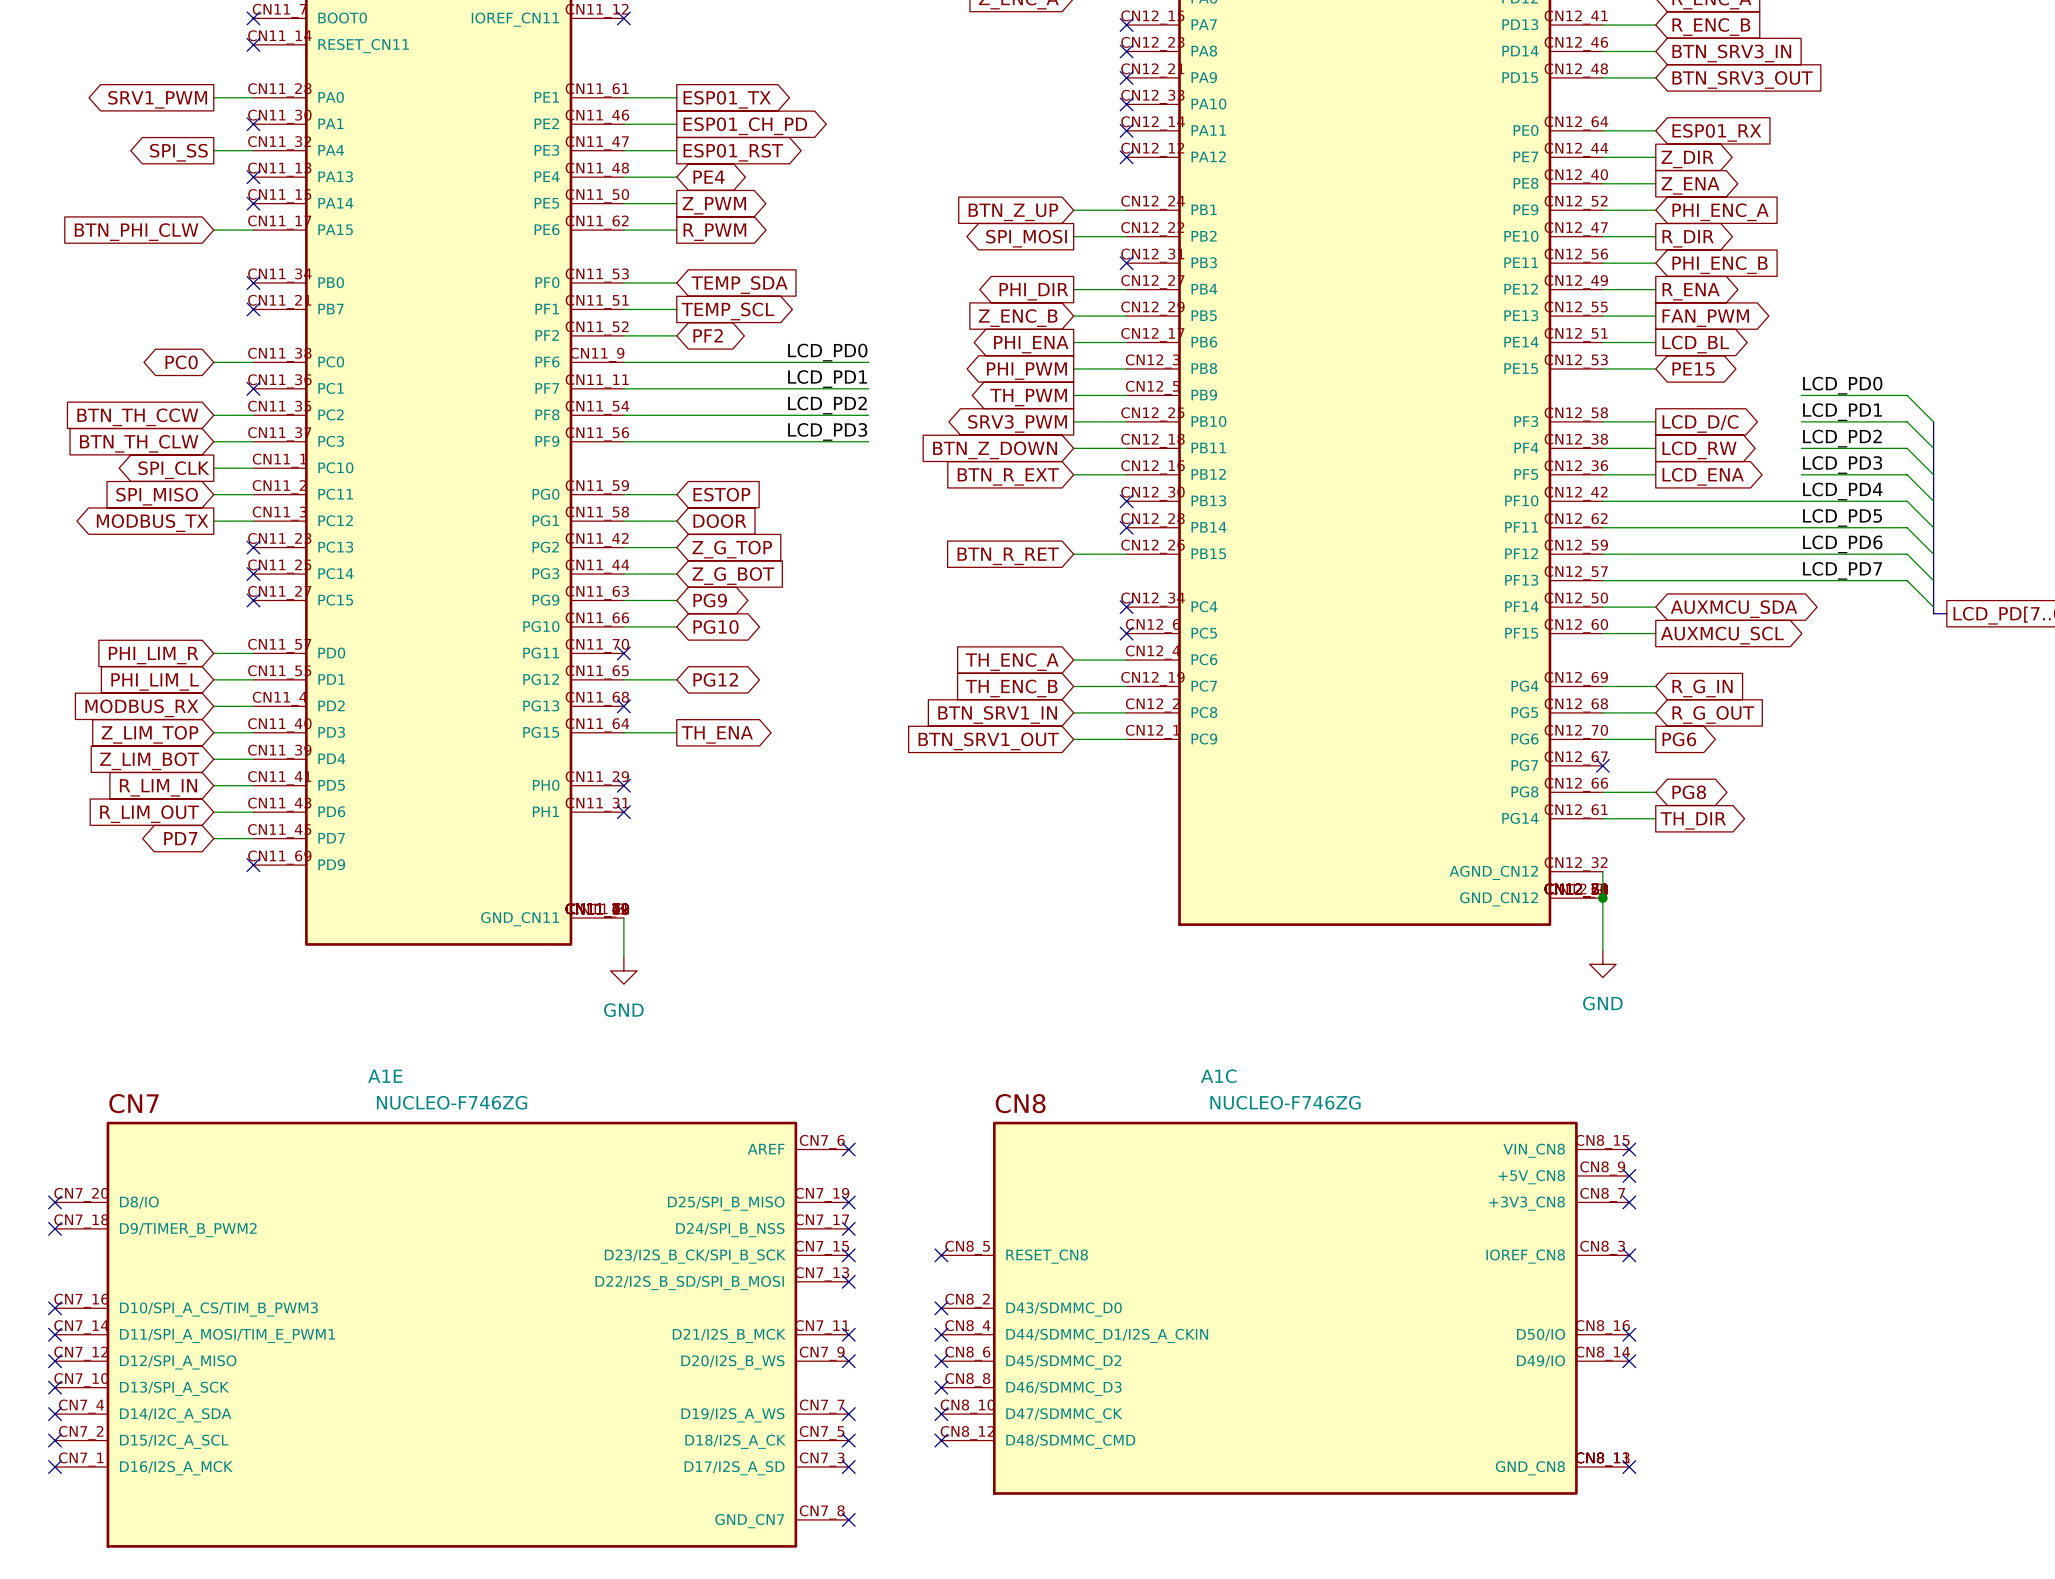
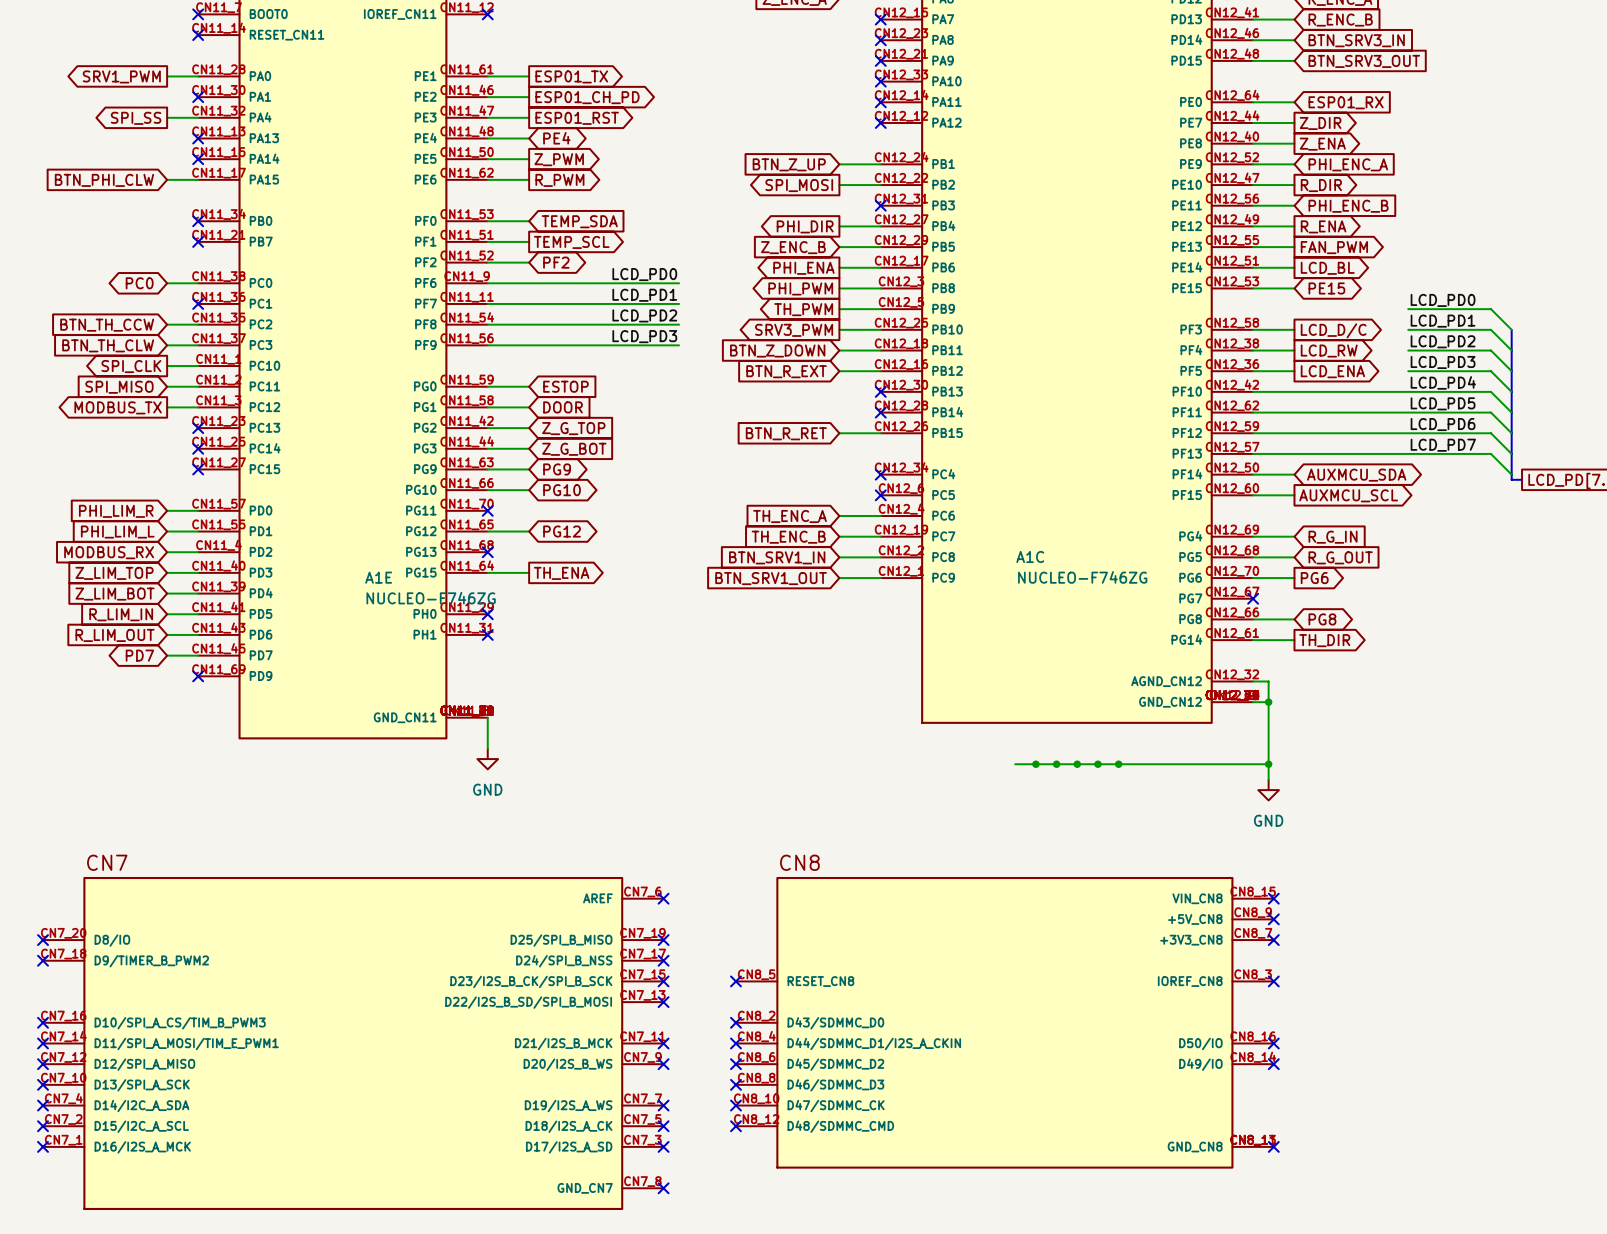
wire: (1602, 871) (1602, 951) -> (1253, 681) (1268, 681) (1268, 779)
wire: none -> (1253, 702) (1268, 702)
junction position: (1602, 898) -> (1268, 702)
power symbol position: GND (1602, 964) -> GND (1268, 790)
wire: none -> (1015, 764) (1268, 764)
junction: none -> (1035, 764)
junction: none -> (1056, 764)
junction: none -> (1077, 764)
junction: none -> (1097, 764)
junction: none -> (1118, 764)
junction: none -> (1268, 764)
A1E name position: A1E (385, 1076) -> A1E (378, 577)
A1C name position: A1C (1218, 1076) -> A1C (1030, 556)
A1E value position: NUCLEO-F746ZG (452, 1102) -> NUCLEO-F746ZG (431, 598)
A1C value position: NUCLEO-F746ZG (1285, 1102) -> NUCLEO-F746ZG (1082, 577)

